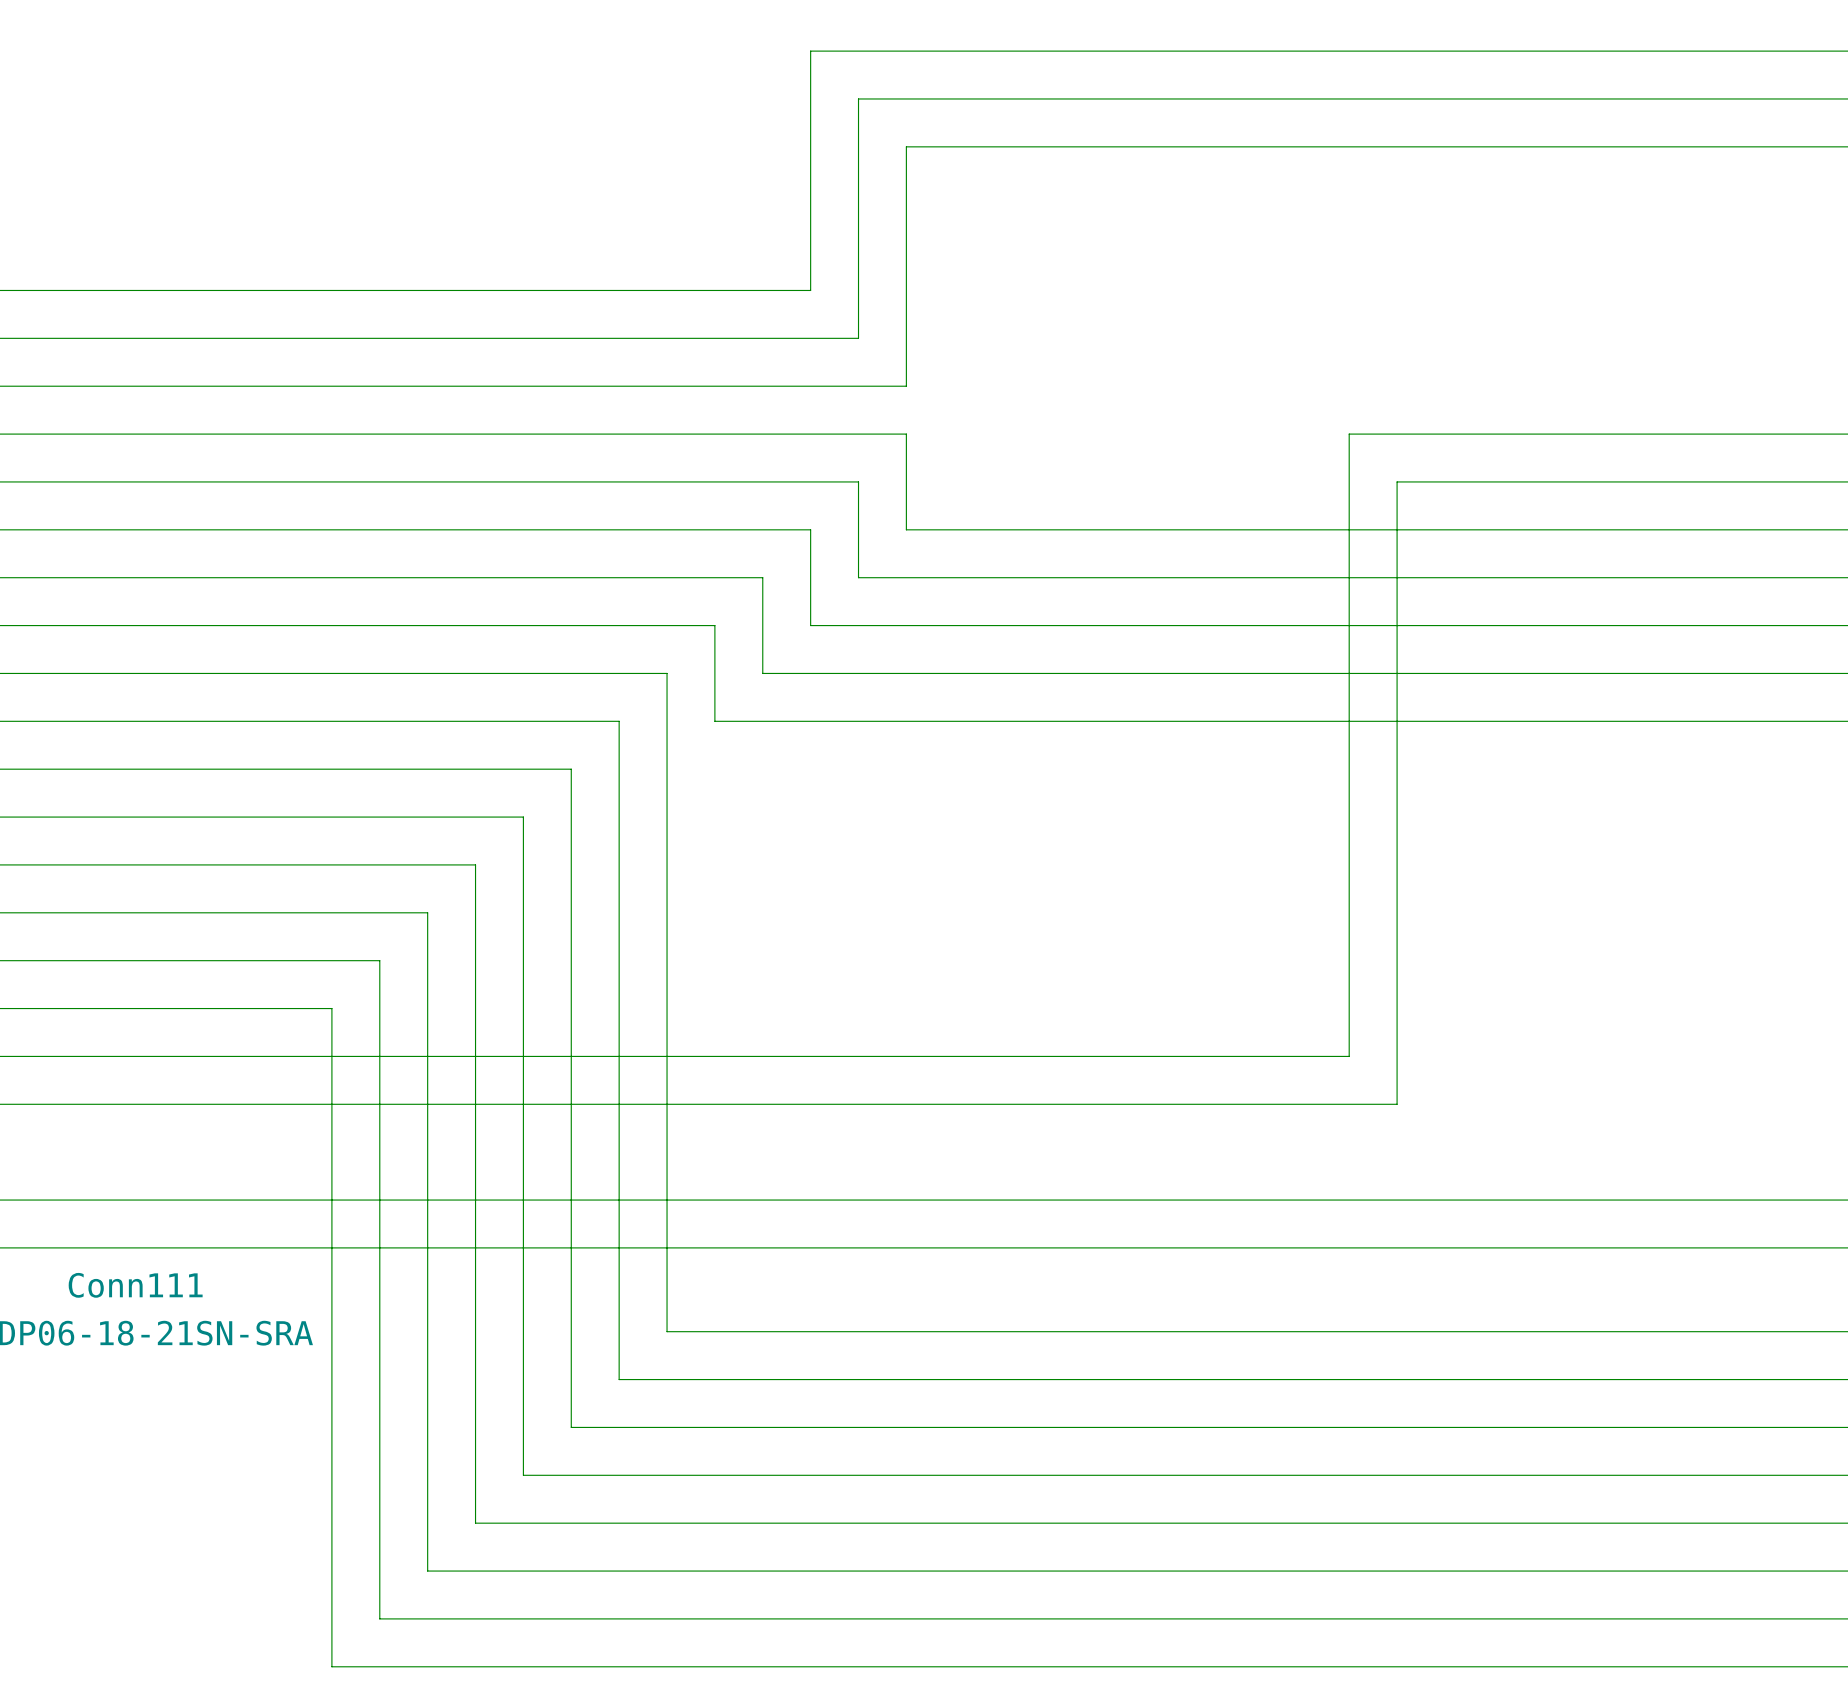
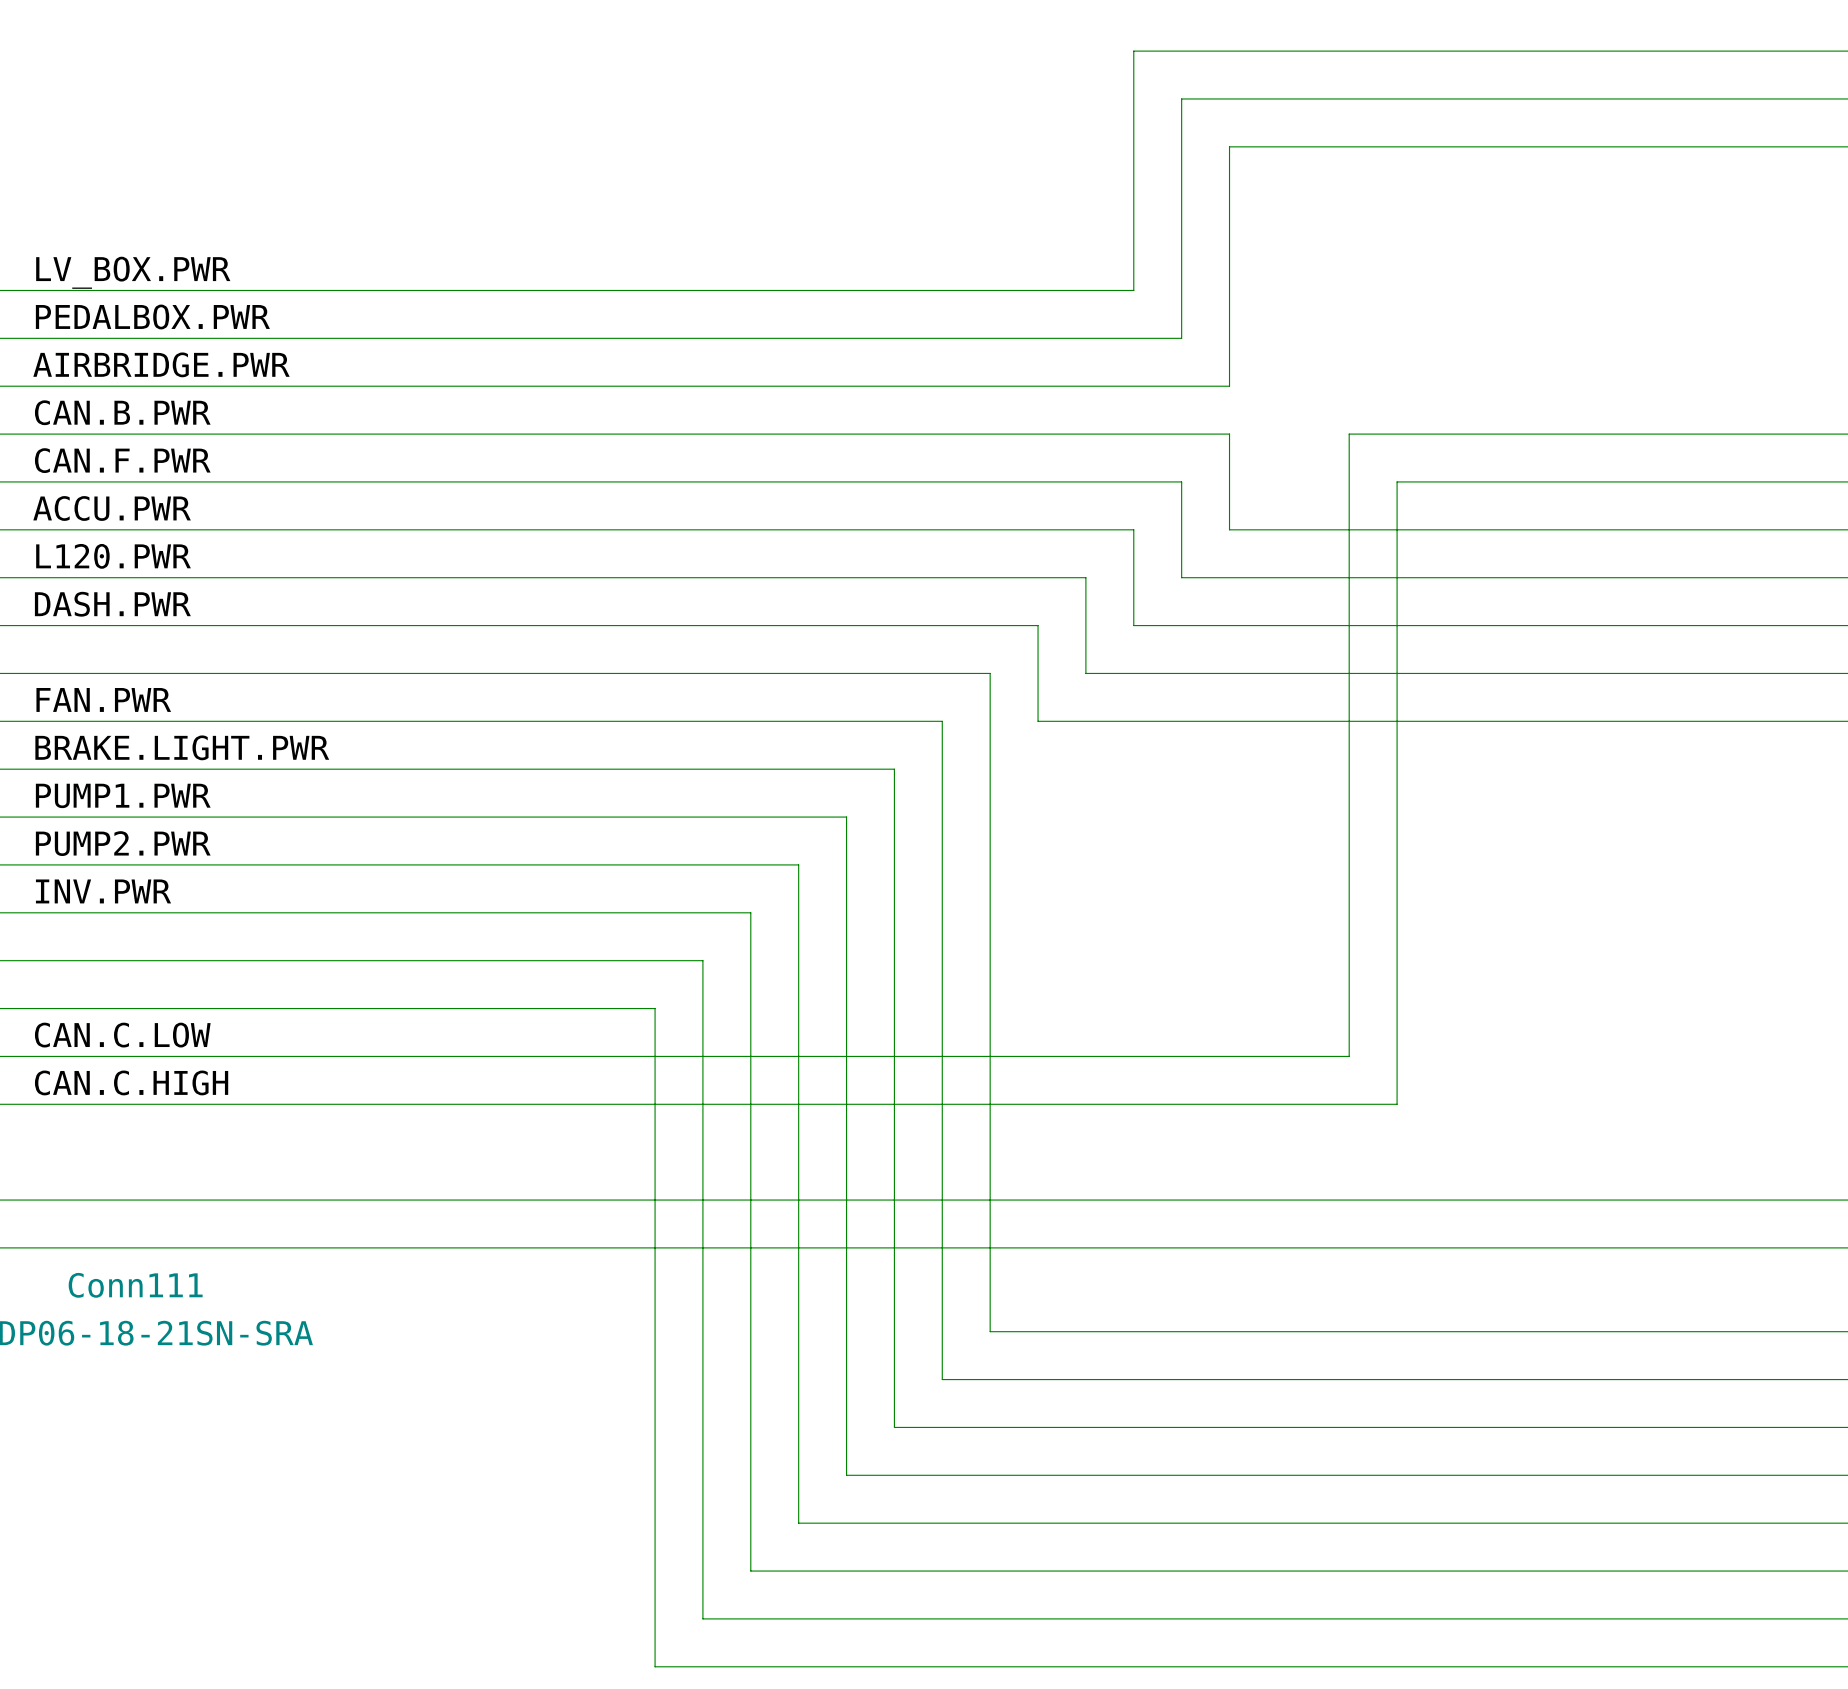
wire: (1133, 51) (810, 51) (810, 290) -> (1133, 51) (1133, 290) (810, 290)
wire: (1181, 98) (858, 98) (858, 338) -> (1181, 98) (1181, 338) (858, 338)
wire: (1229, 146) (906, 146) (906, 386) -> (1229, 146) (1229, 386) (906, 386)
label: none -> LV_BOX.PWR (133, 272)
label: none -> PEDALBOX.PWR (152, 317)
label: none -> AIRBRIDGE.PWR (161, 364)
label: none -> CAN.B.PWR (122, 412)
wire: (906, 434) (906, 529) -> (810, 529) (906, 529)
wire: none -> (906, 434) (1229, 434) (1229, 529)
label: none -> CAN.F.PWR (122, 460)
wire: (858, 481) (858, 577) -> (762, 577) (858, 577)
wire: none -> (858, 481) (1181, 481) (1181, 577)
label: none -> ACCU.PWR (112, 508)
wire: (810, 529) (810, 625) -> none
wire: (1133, 529) (1229, 529) -> (1133, 529) (1133, 625)
label: none -> L120.PWR (113, 556)
wire: (762, 577) (762, 673) -> (667, 673) (762, 673)
wire: (1085, 577) (1181, 577) -> (1085, 577) (1085, 673)
label: none -> DASH.PWR (112, 604)
wire: (714, 625) (714, 721) -> (714, 625) (810, 625)
wire: (1038, 625) (1133, 625) -> (1038, 625) (1038, 721)
wire: (667, 673) (667, 1331) (990, 1331) -> (990, 673) (990, 1331)
wire: (990, 673) (1085, 673) -> none
label: none -> FAN.PWR (103, 699)
wire: (619, 721) (619, 1379) (942, 1379) -> (942, 721) (942, 1379)
wire: (942, 721) (1038, 721) -> (619, 721) (714, 721)
label: none -> BRAKE.LIGHT.PWR (182, 747)
wire: (571, 769) (571, 1427) (894, 1427) -> (571, 769) (894, 769) (894, 1427)
label: none -> PUMP1.PWR (123, 795)
wire: (523, 817) (523, 1475) (846, 1475) -> (523, 817) (846, 817) (846, 1475)
label: none -> PUMP2.PWR (123, 843)
wire: (475, 864) (475, 1523) (798, 1523) -> (475, 864) (798, 864) (798, 1523)
label: none -> INV.PWR (103, 891)
wire: (427, 912) (427, 1571) (750, 1571) -> (427, 912) (750, 912) (750, 1571)
wire: (379, 960) (379, 1618) (702, 1618) -> (379, 960) (702, 960) (702, 1618)
wire: (331, 1008) (331, 1666) (655, 1666) -> (331, 1008) (655, 1008) (655, 1666)
label: none -> CAN.C.LOW (122, 1035)
label: none -> CAN.C.HIGH (131, 1082)

